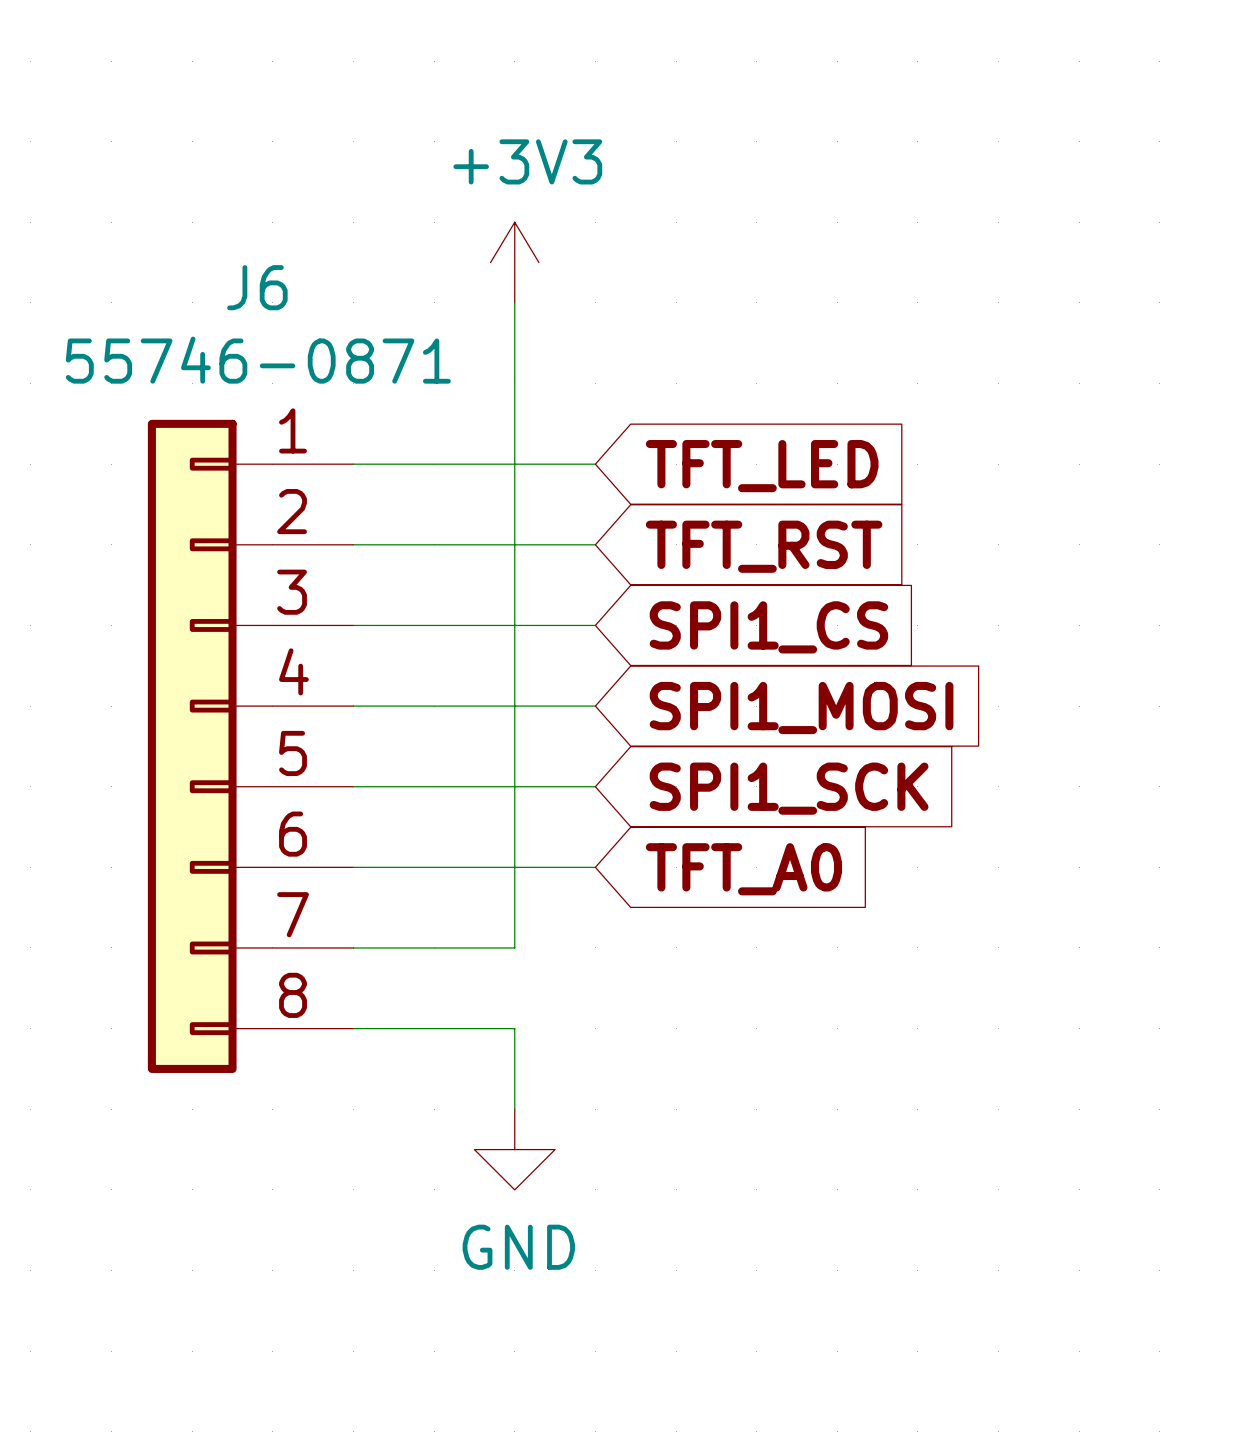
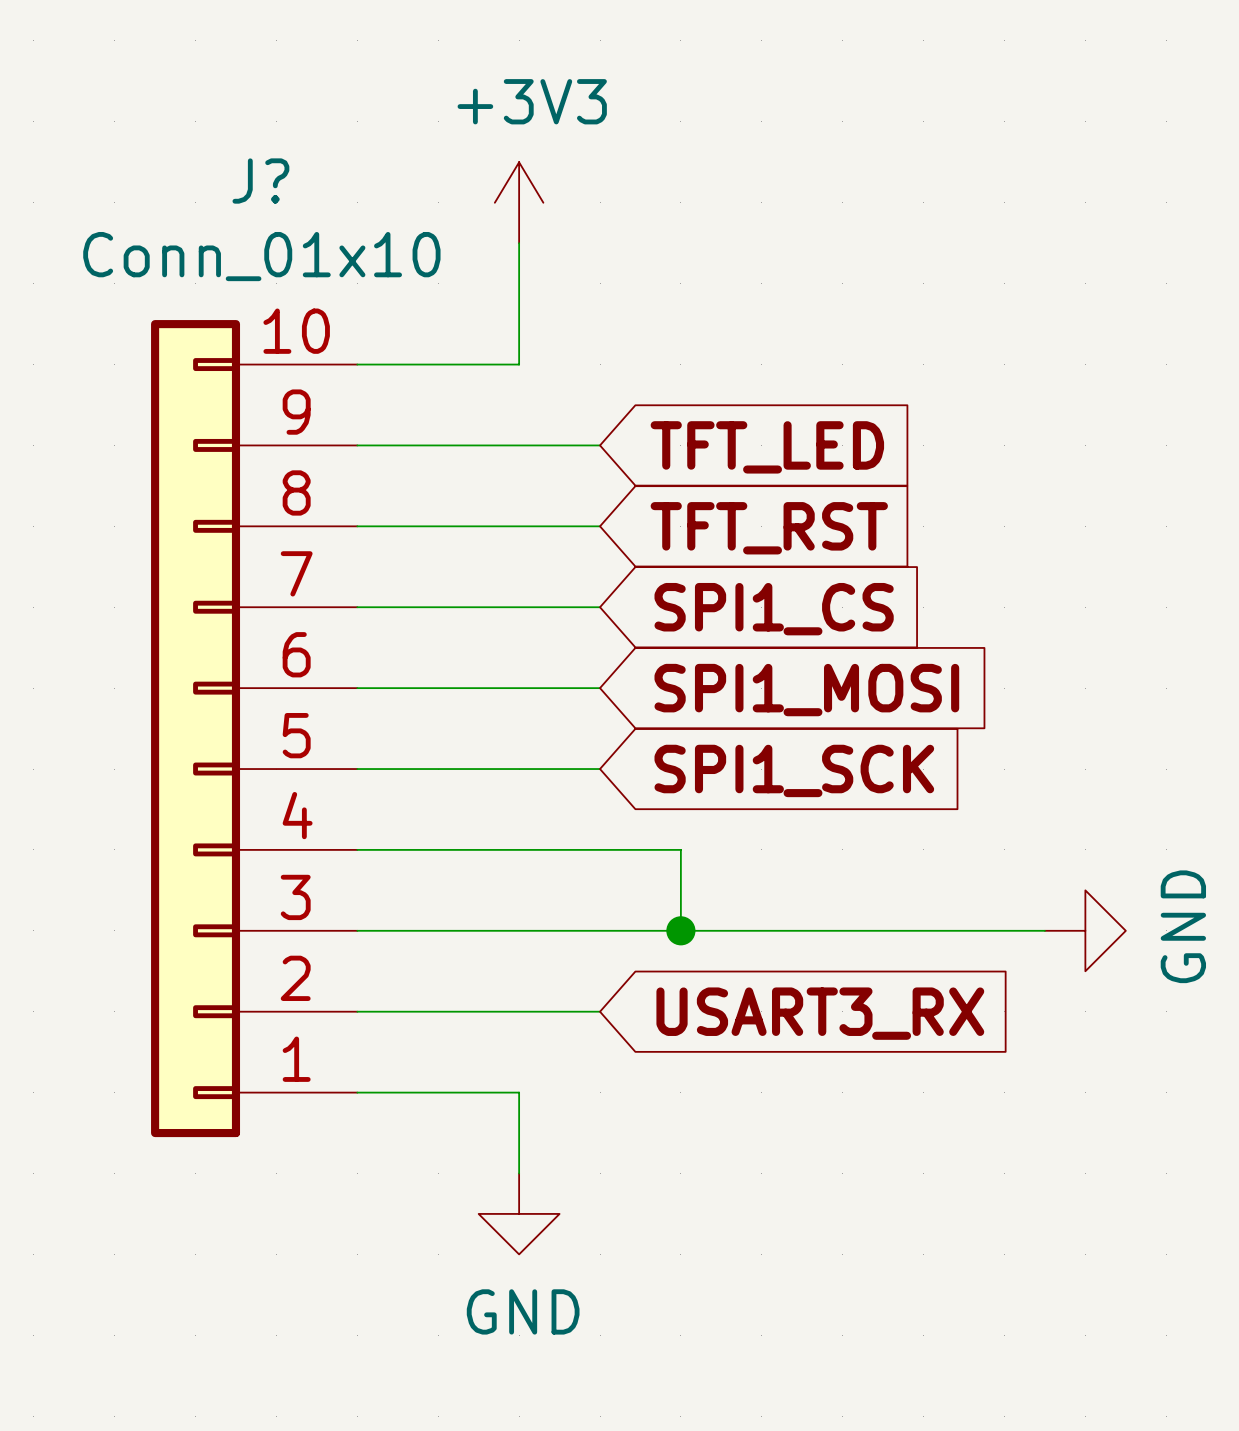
power symbol position: +3V3 (514, 262) -> +3V3 (519, 202)
wire: (514, 383) (514, 947) -> (519, 364) (357, 364)
J6: 55746-0871 (250, 746) -> none
J?: none -> Conn_01x10 (254, 728)
wire: none -> (600, 849) (680, 849) (680, 930)
global label: TFT_A0 (743, 869) -> none
wire: none -> (519, 930) (1044, 930)
junction: none -> (680, 930)
power symbol: none -> GND (1085, 930)
wire: (514, 1028) (514, 1109) -> (519, 1011) (600, 1011)
global label: none -> USART3_RX (820, 1013)
wire: none -> (357, 1092) (519, 1092) (519, 1173)
power symbol position: GND (514, 1149) -> GND (519, 1213)

